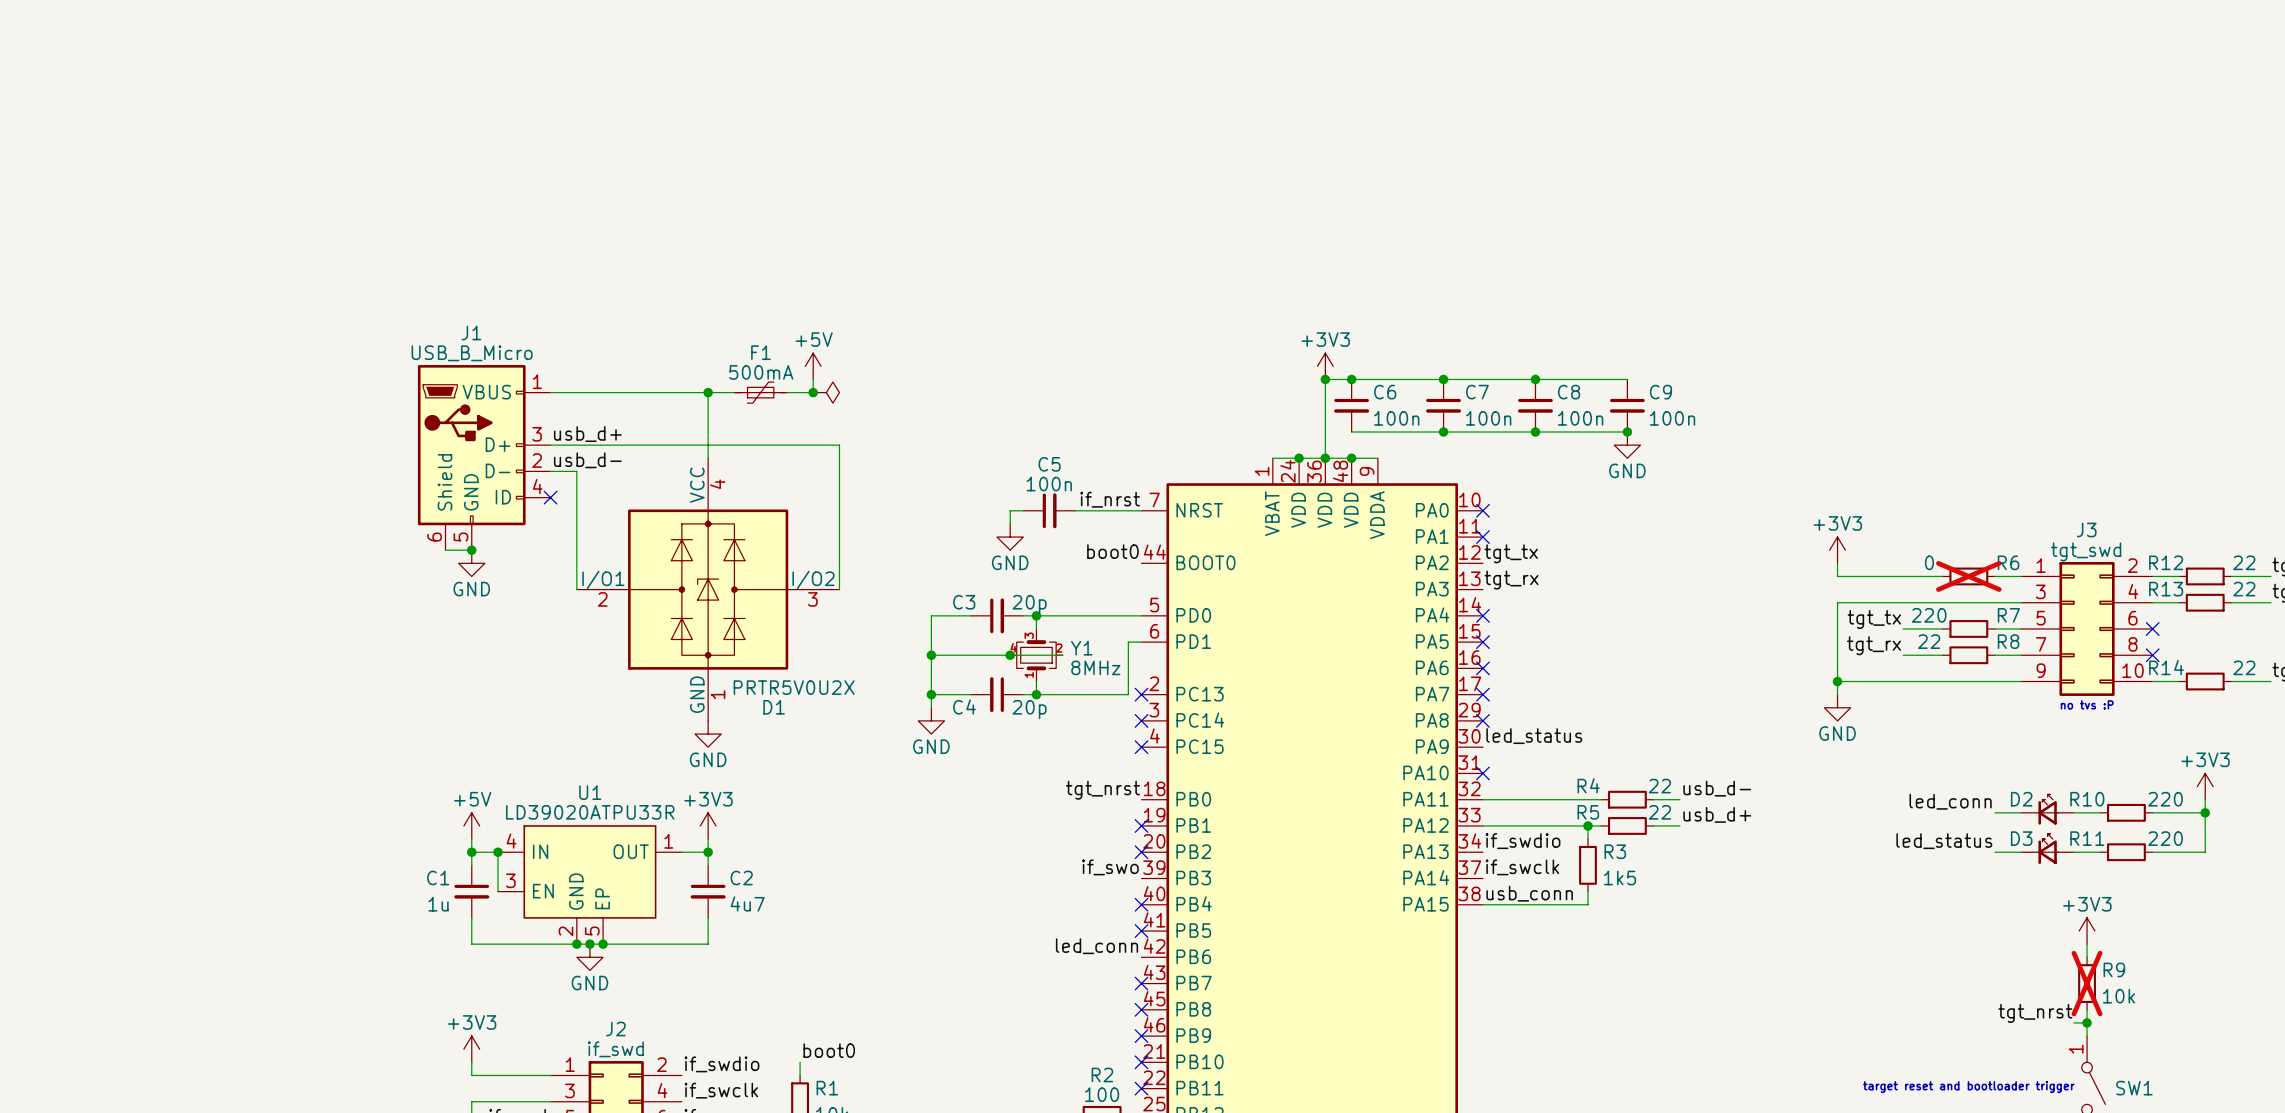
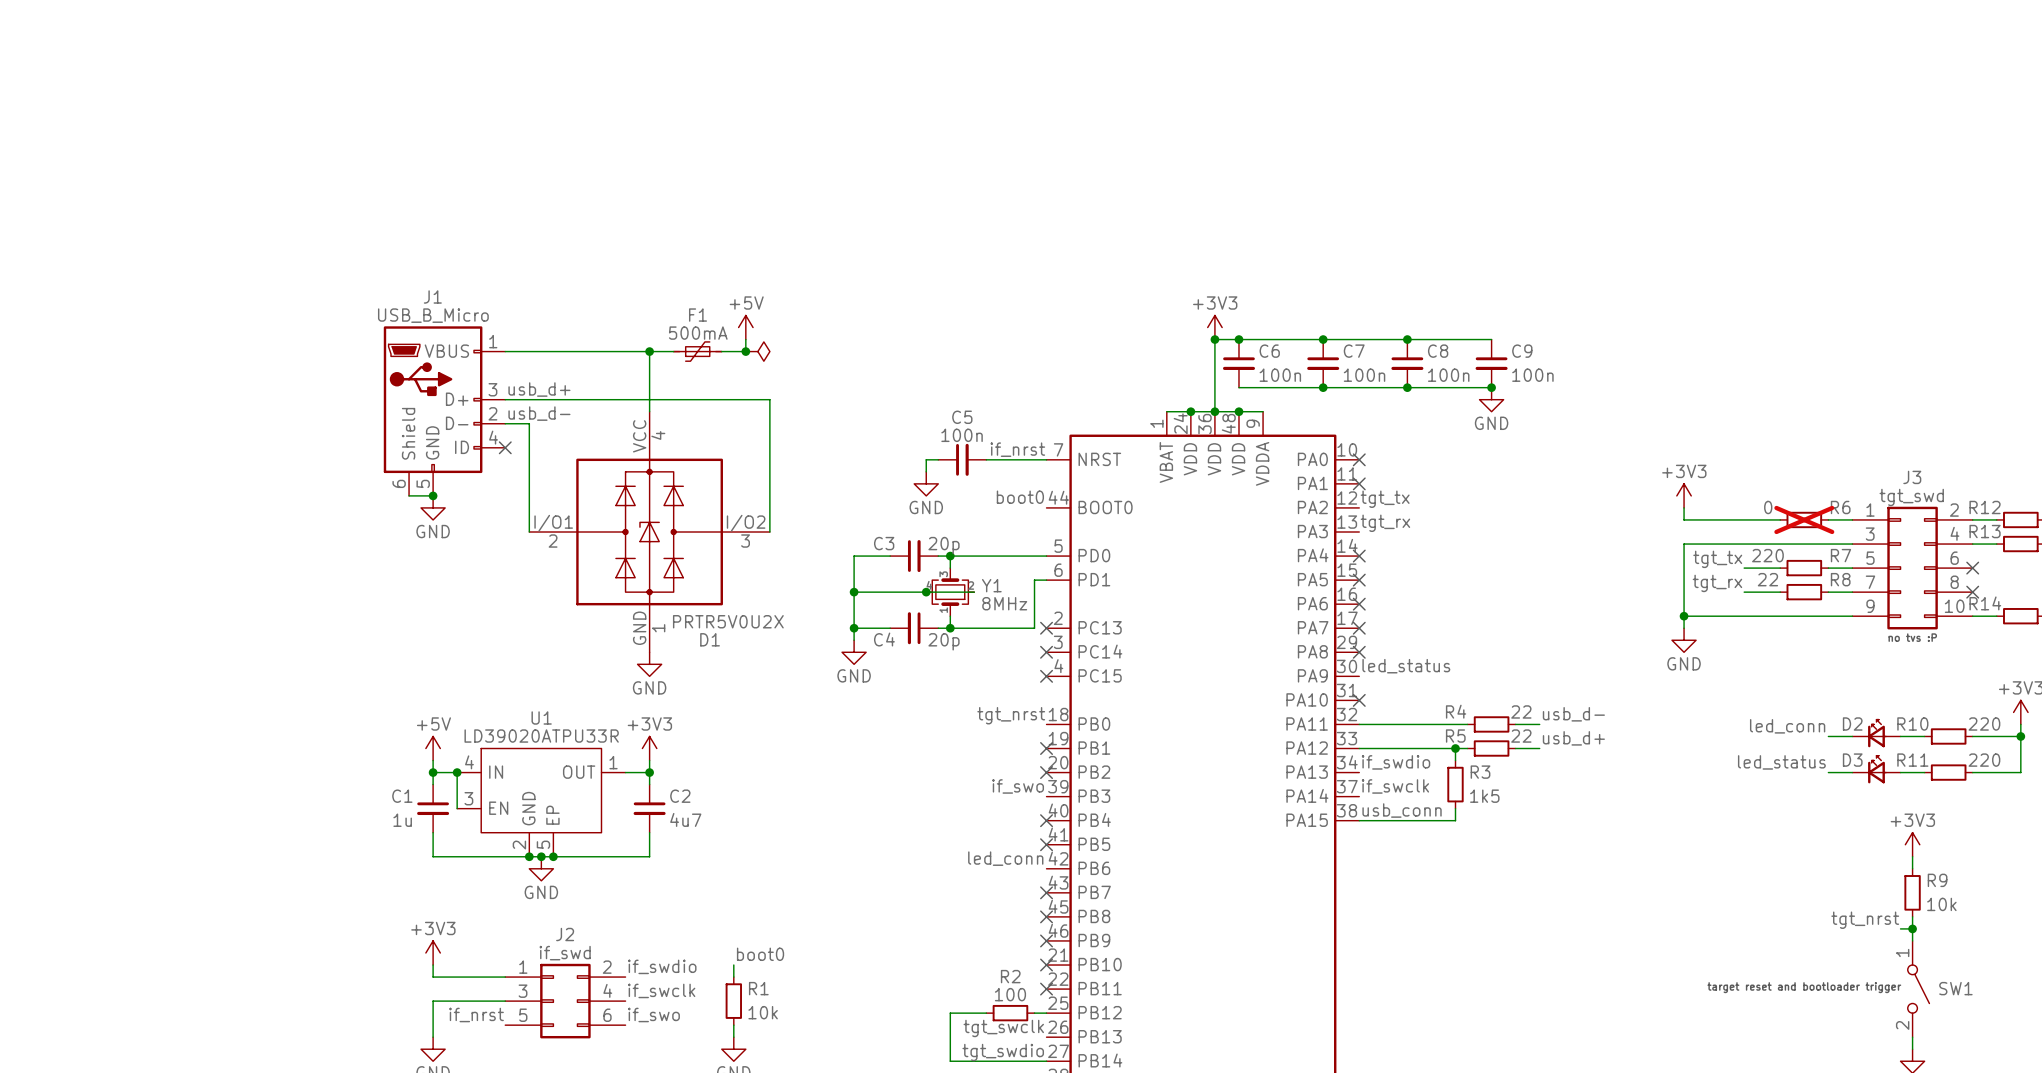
R9 do-not-place cross: (2087, 983) -> none

